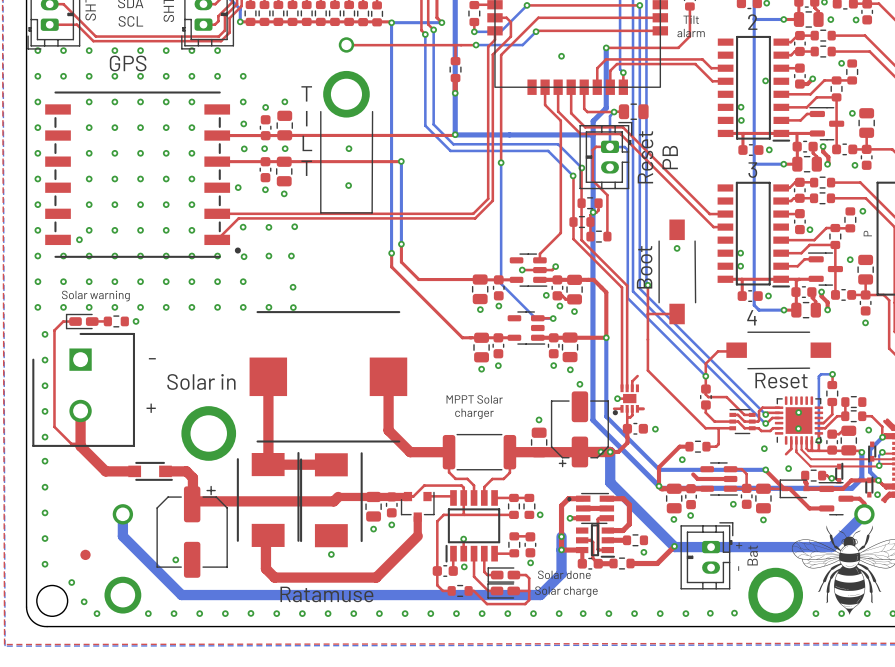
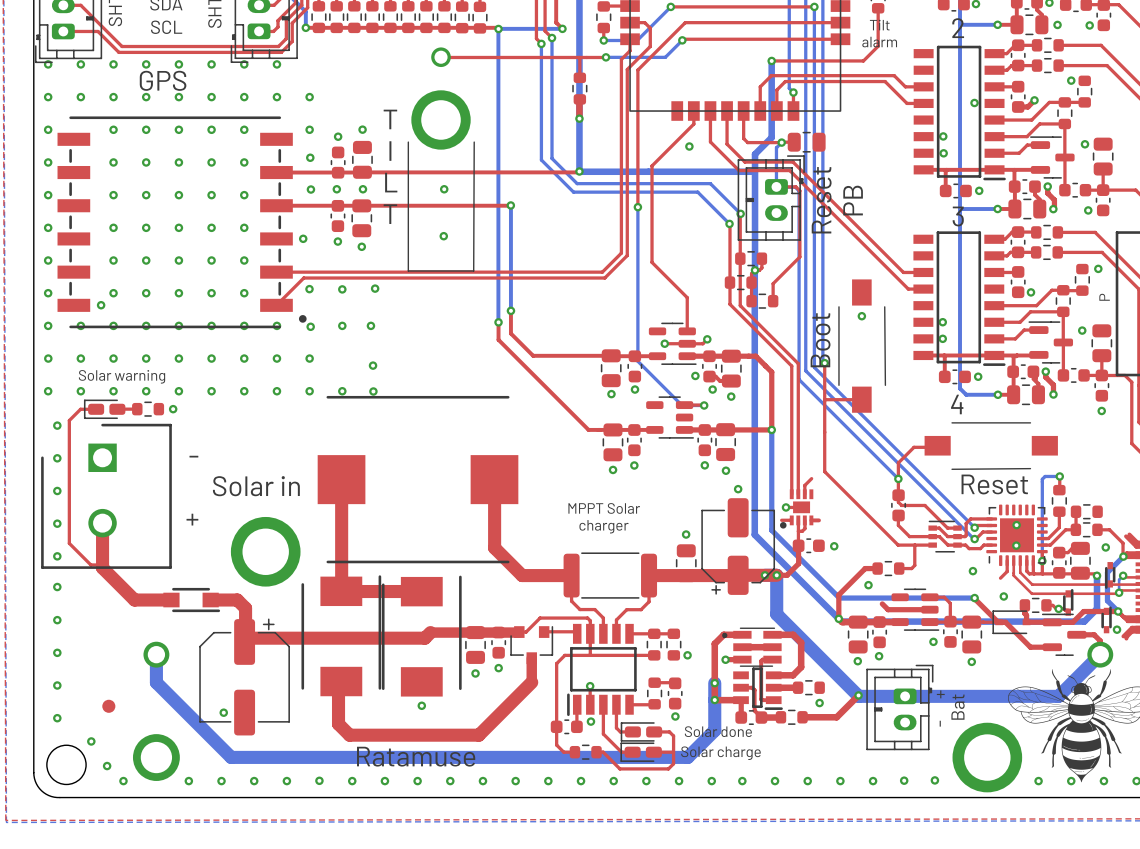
via: (561, 56) -> none
top track: (545, 97) (545, 105) (560, 120) (560, 233) (539, 253) -> (693, 124) (652, 165) (652, 262) (687, 297) (687, 323)
via: none -> (689, 146)
top track: (610, 146) (596, 146) (592, 150) (592, 180) (607, 195) (607, 222) -> (776, 186) (795, 186) (799, 190) (799, 256) (773, 283)

